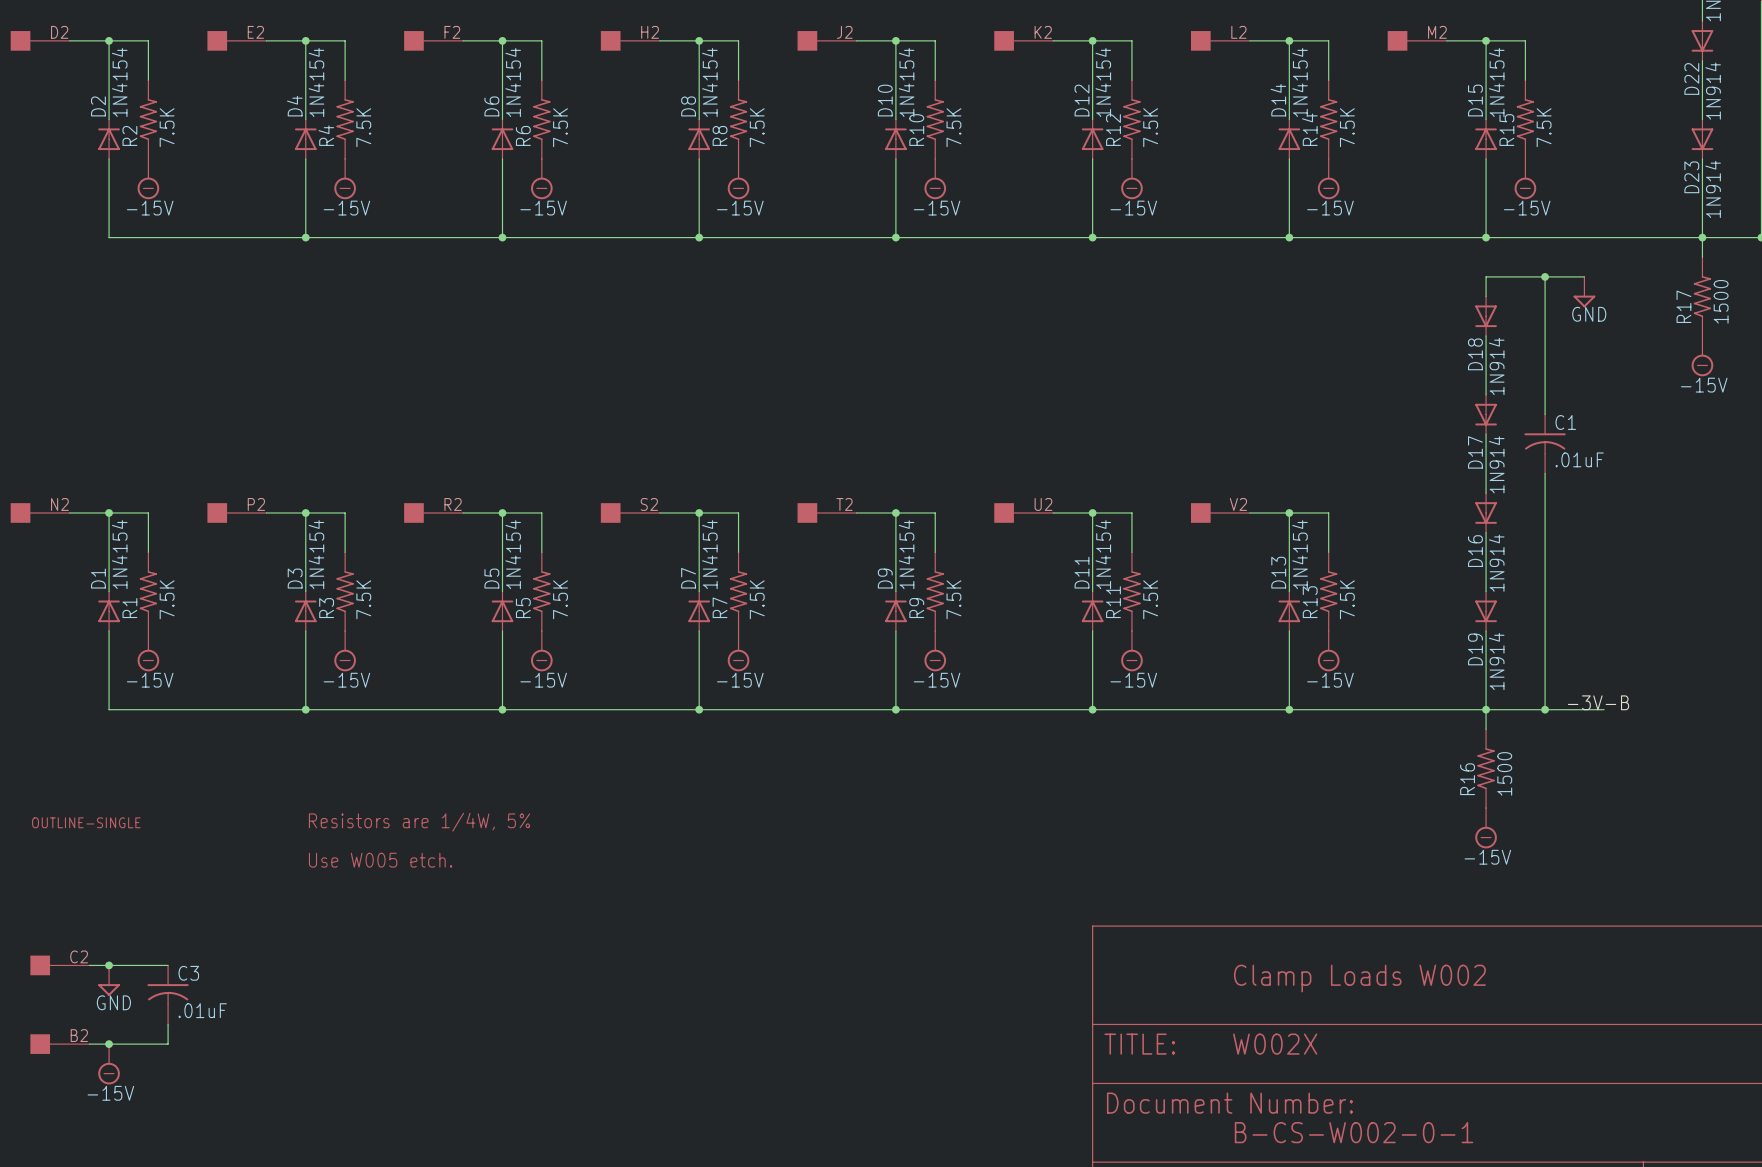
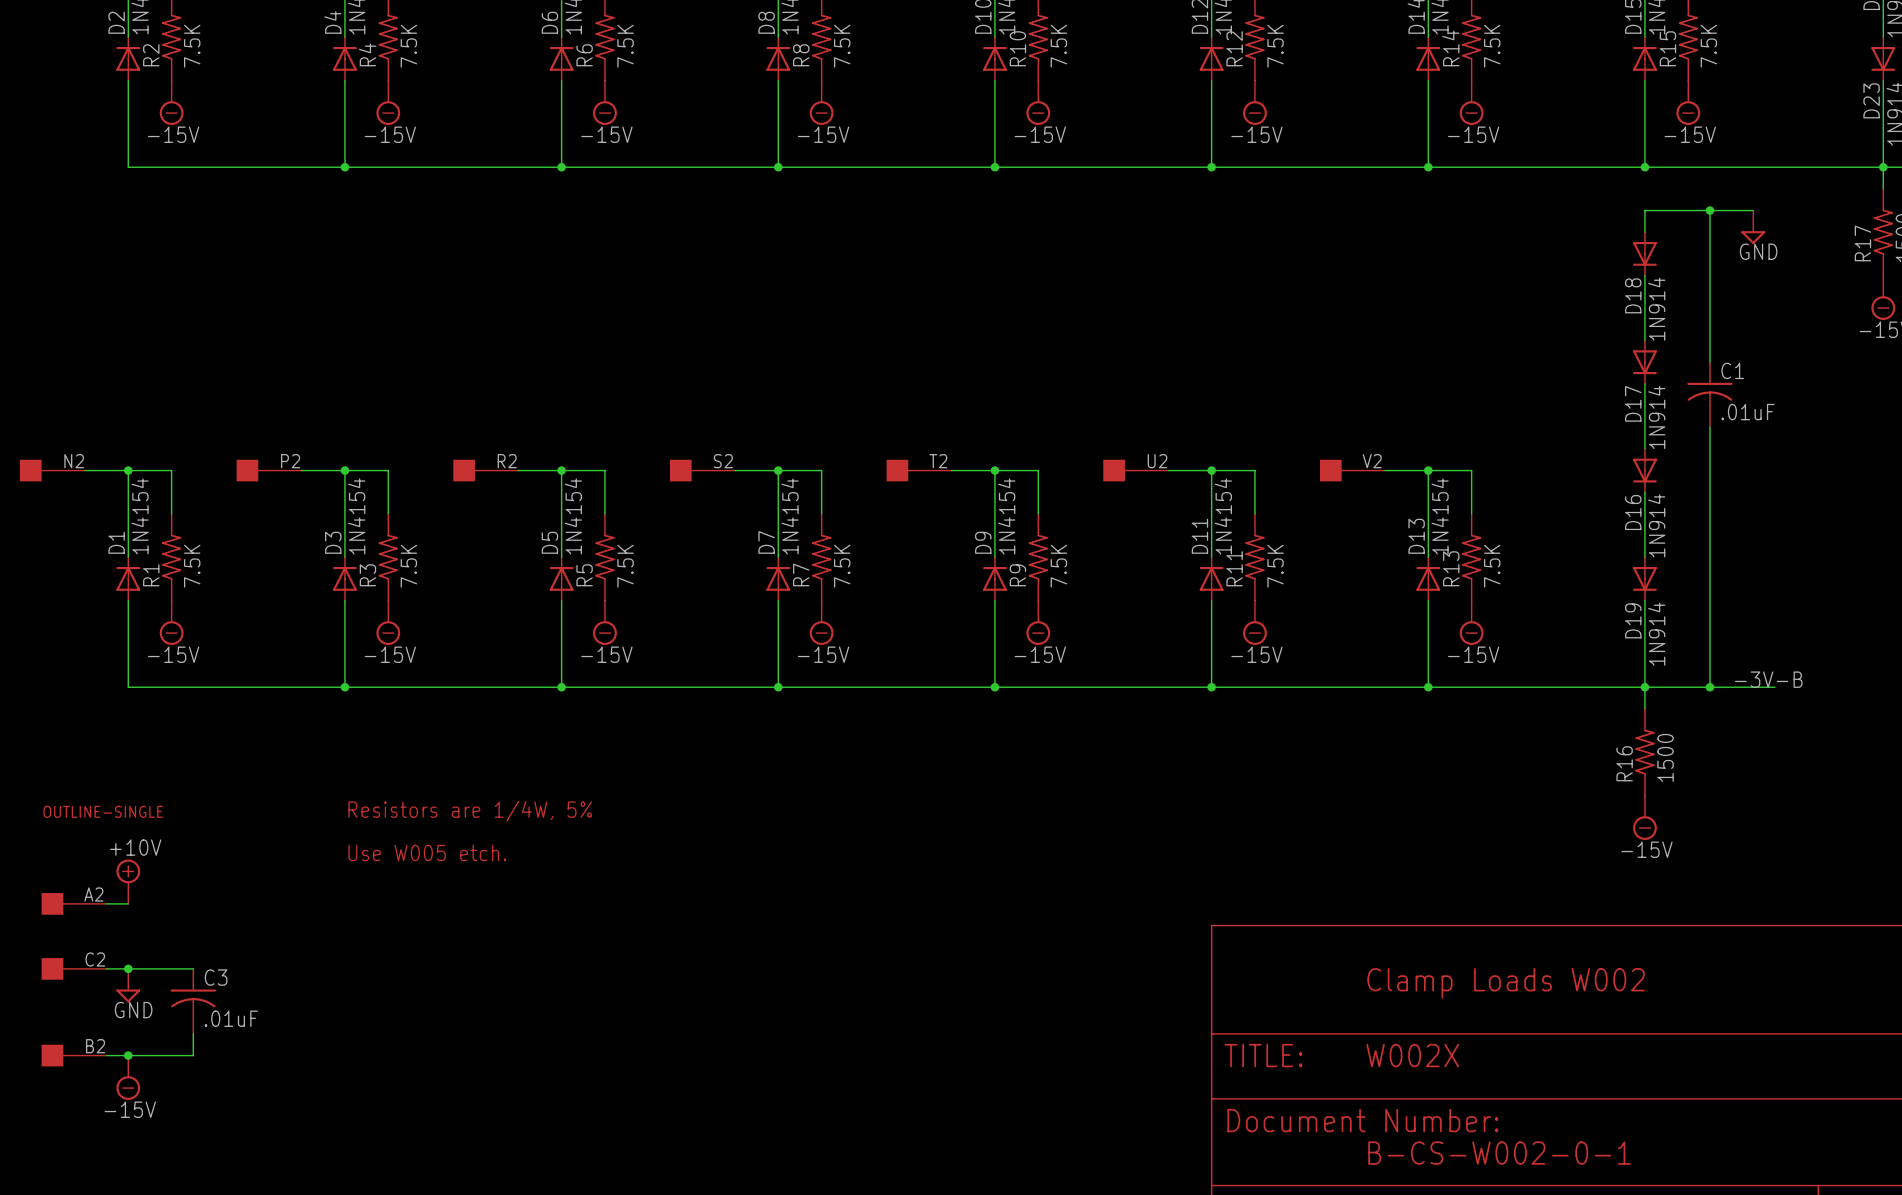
power symbol: none -> +10V (128, 881)
part: none -> (74, 903)
wire: none -> (106, 903) (128, 903)

